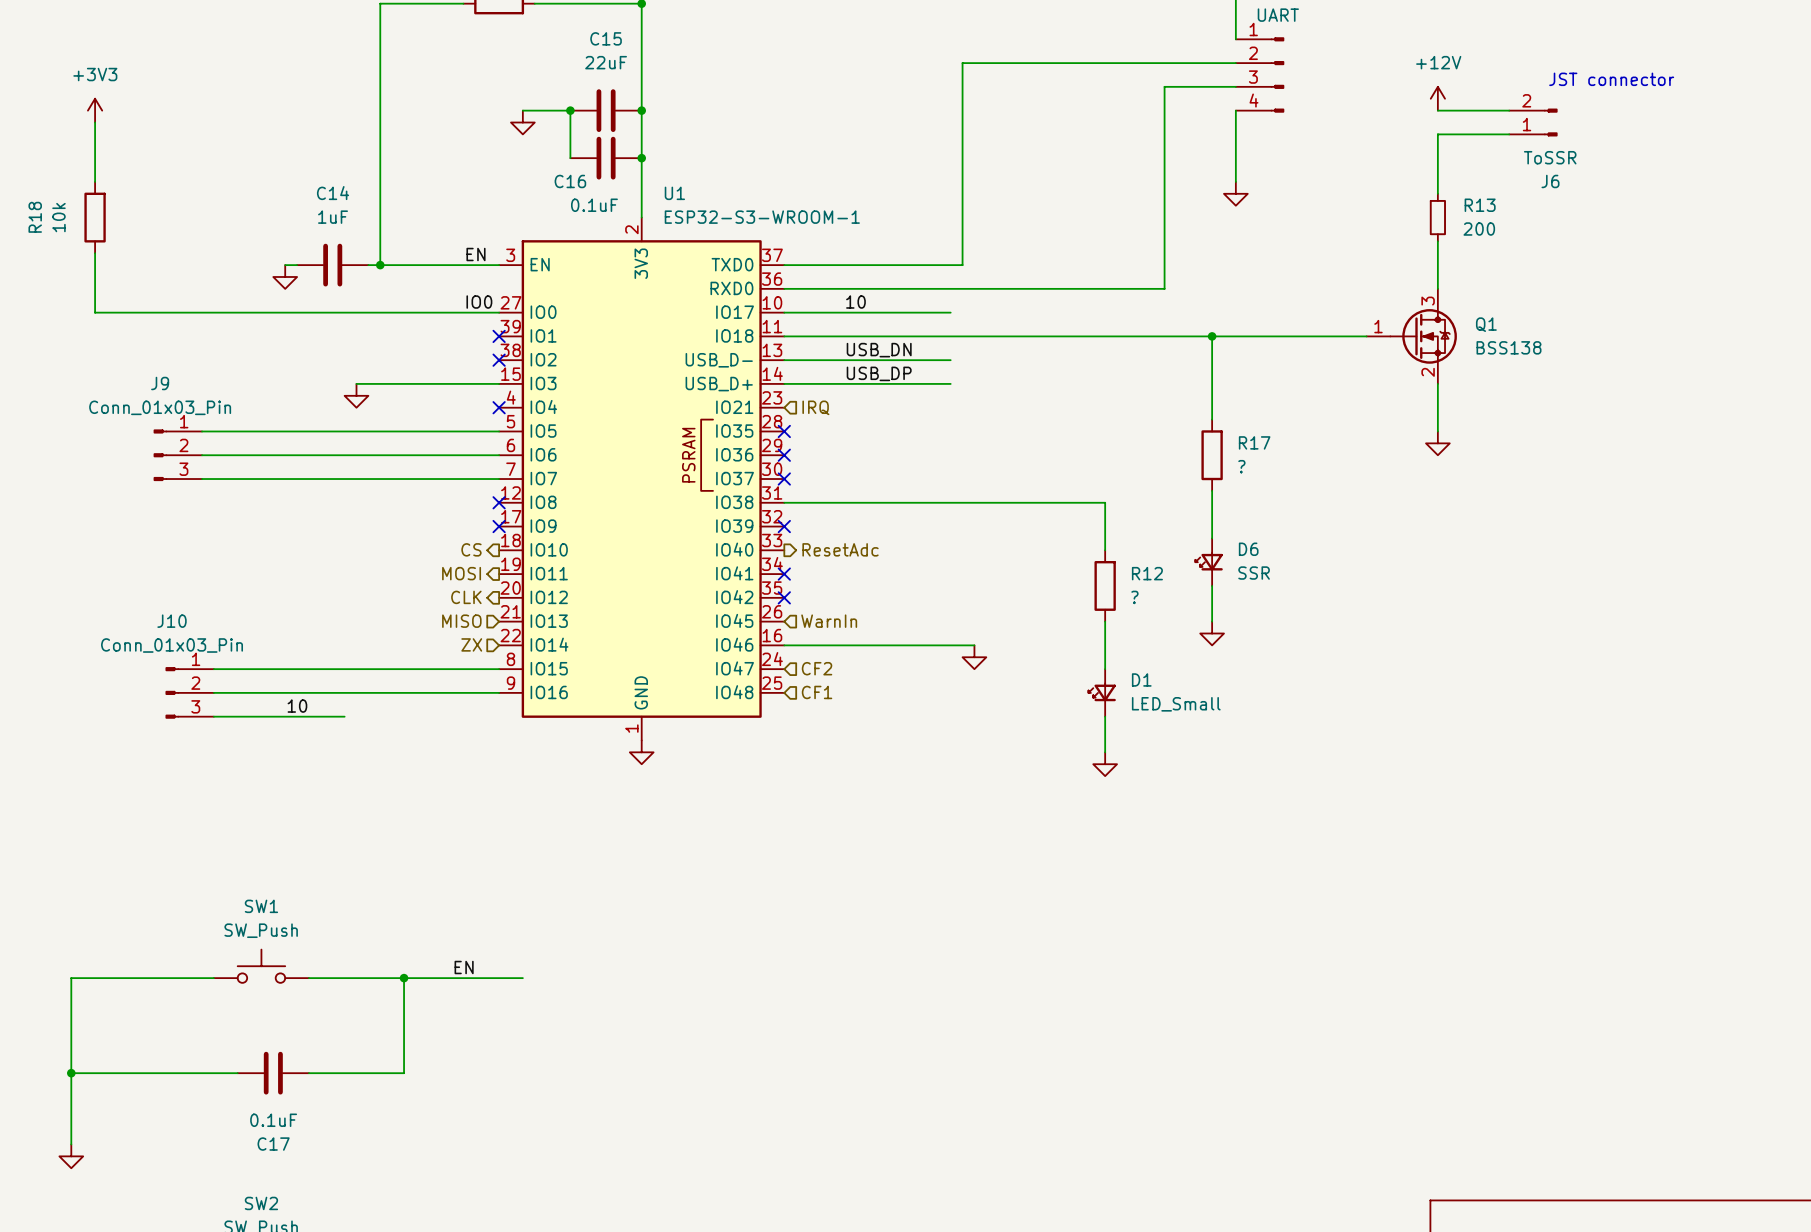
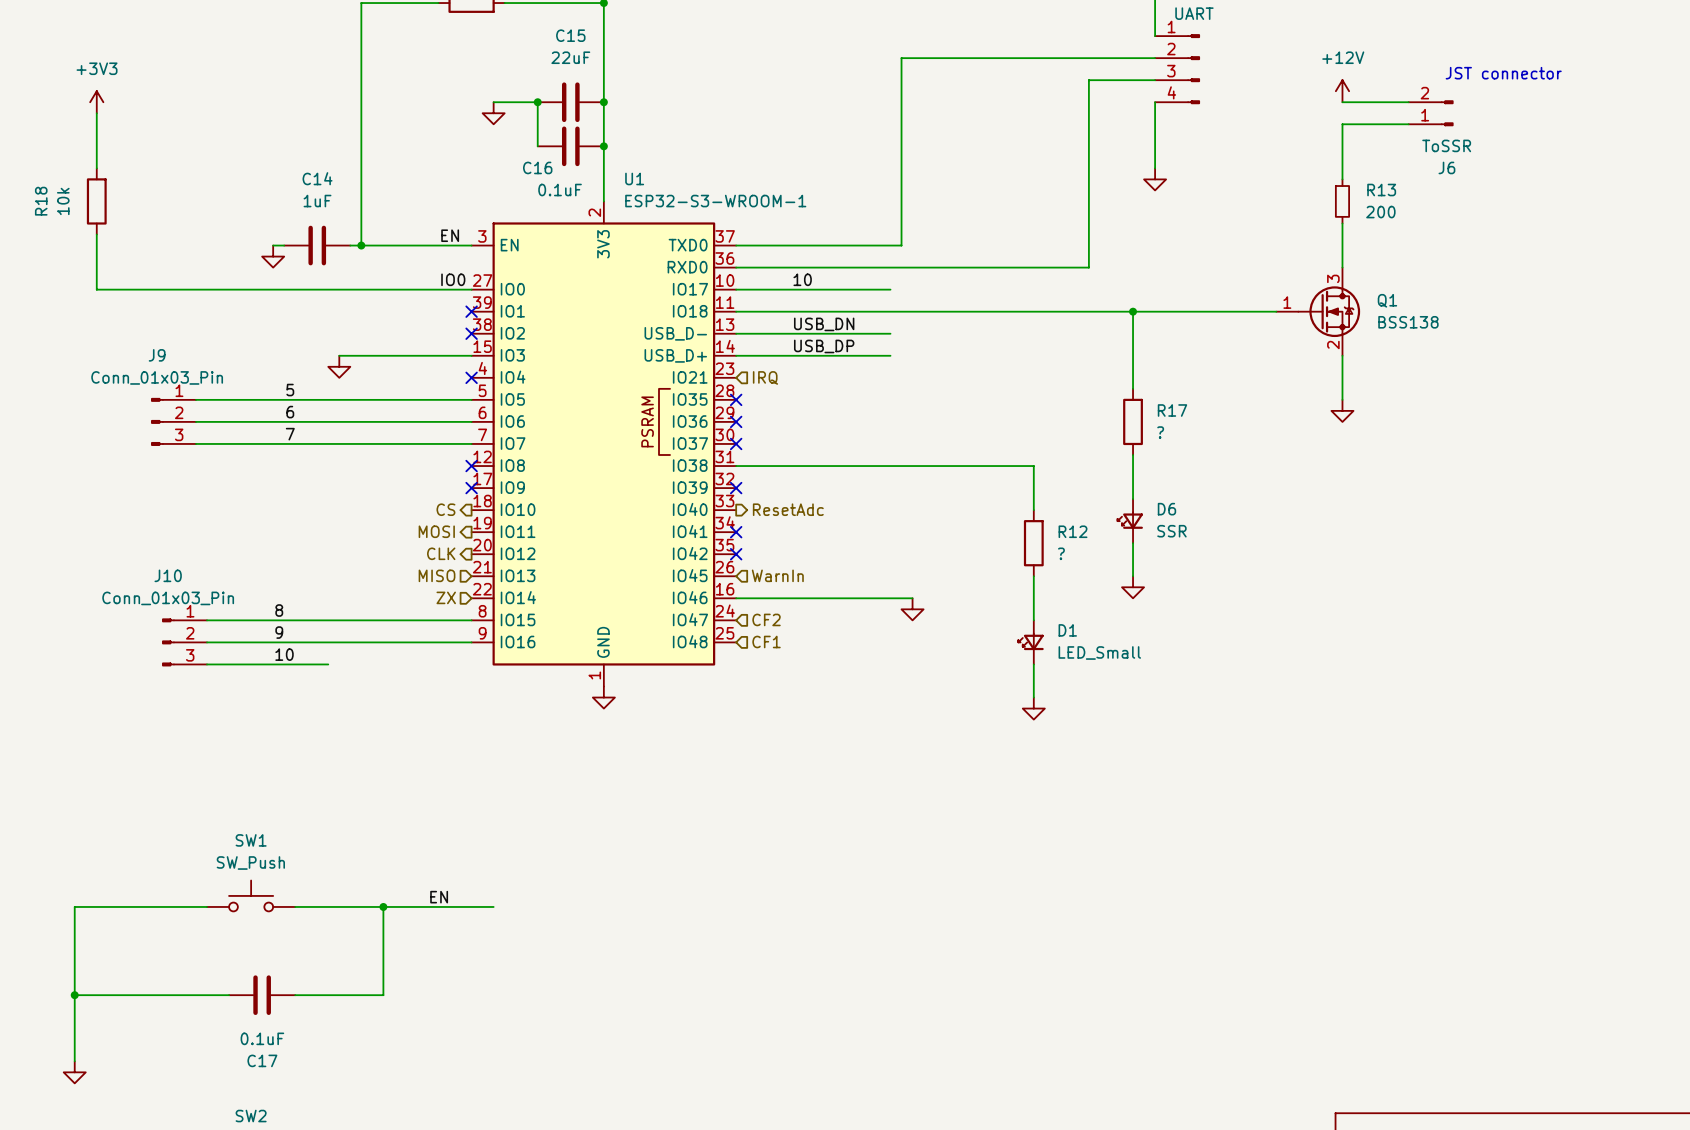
label: none -> 5 (290, 390)
label: none -> 6 (290, 412)
label: none -> 7 (290, 434)
label: none -> 8 (279, 610)
label: none -> 9 (279, 632)

